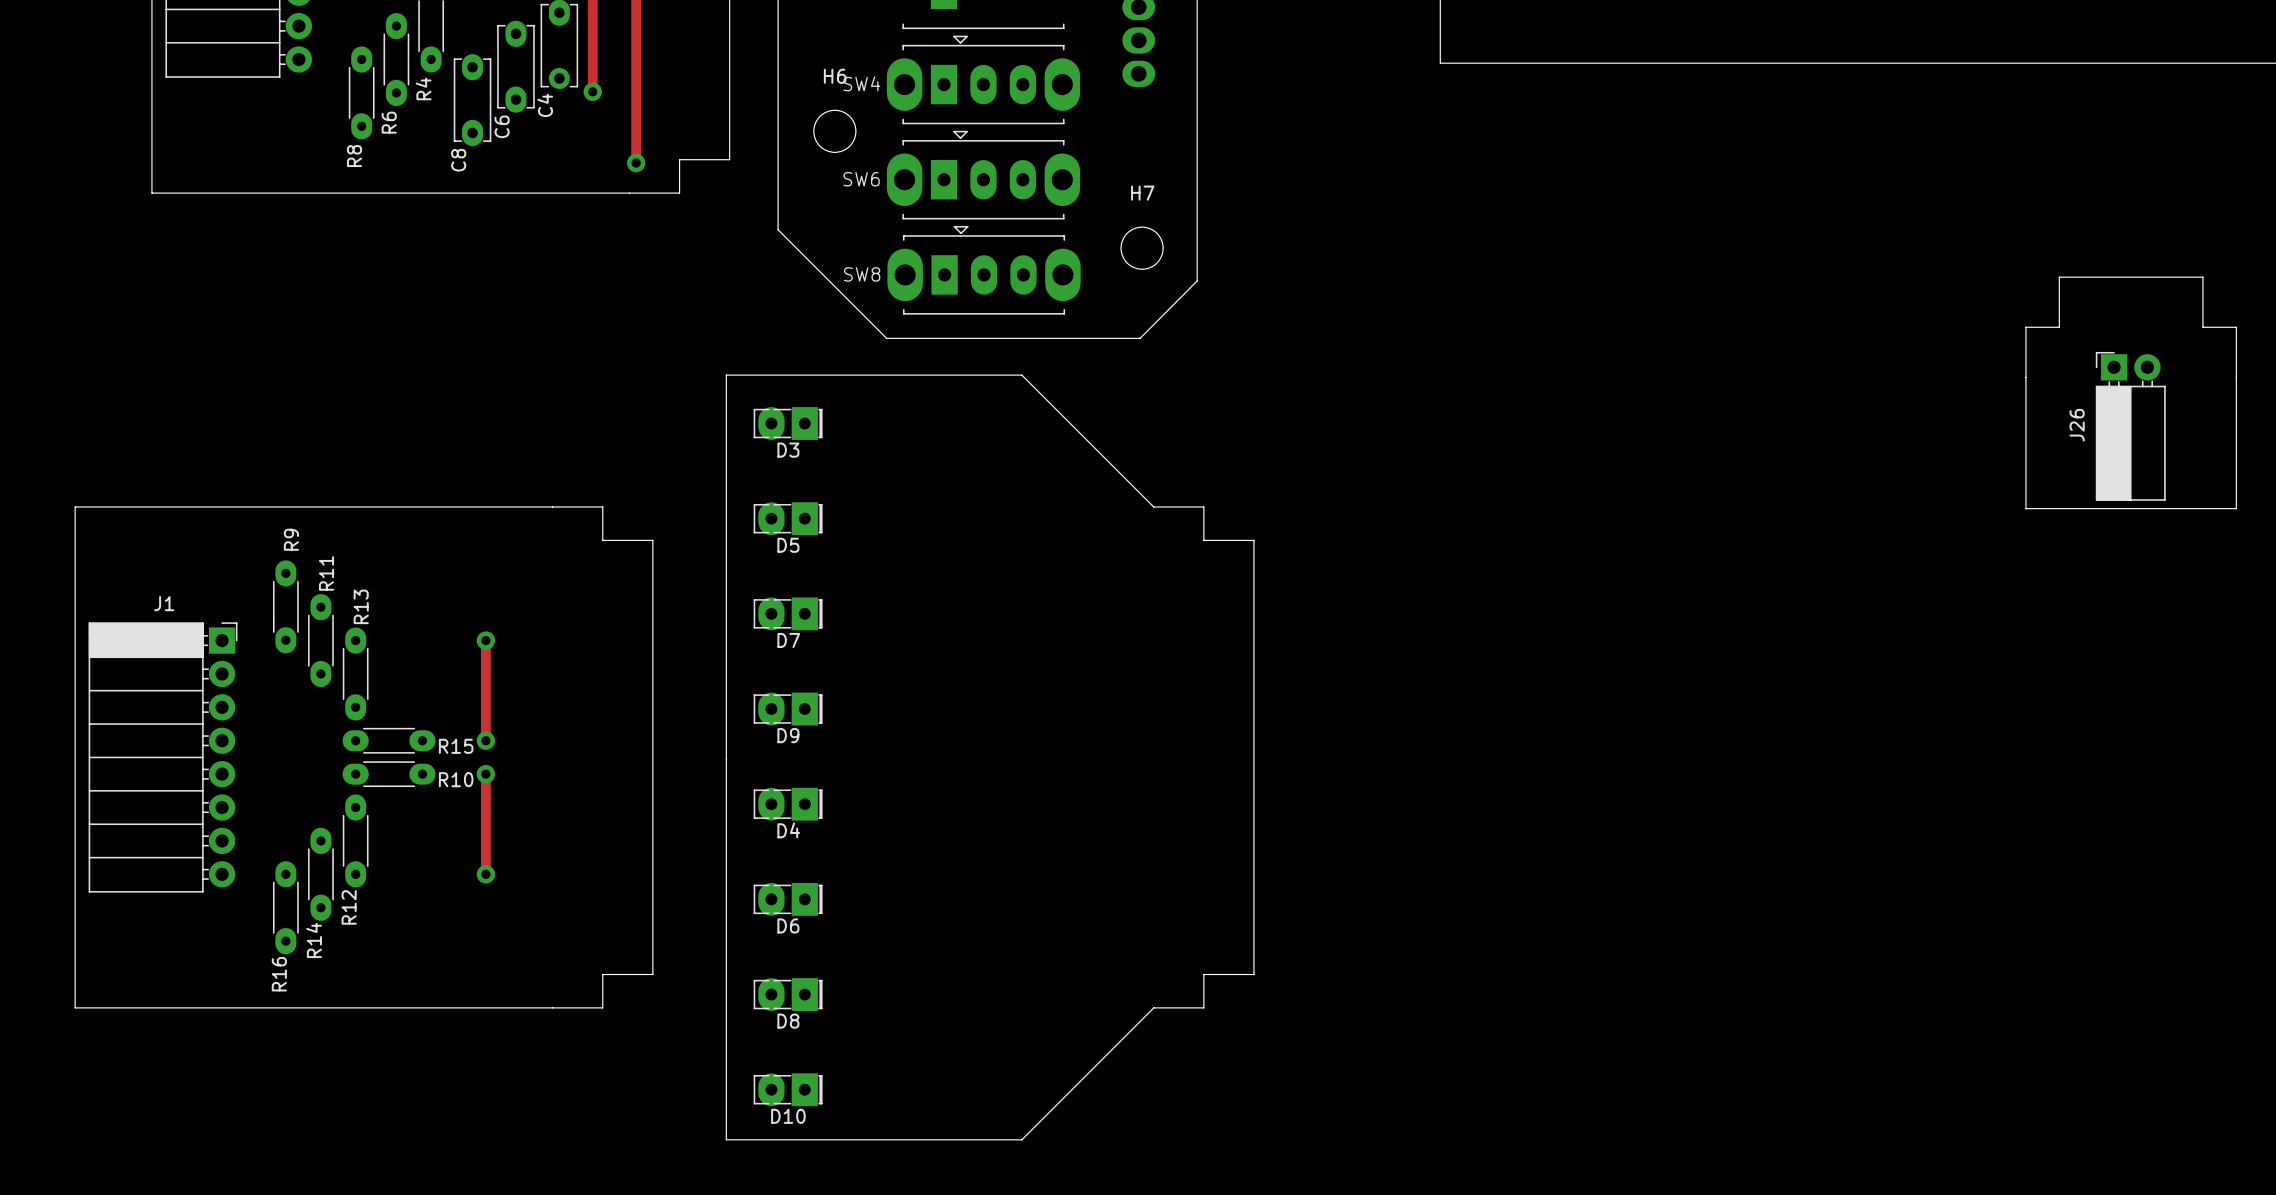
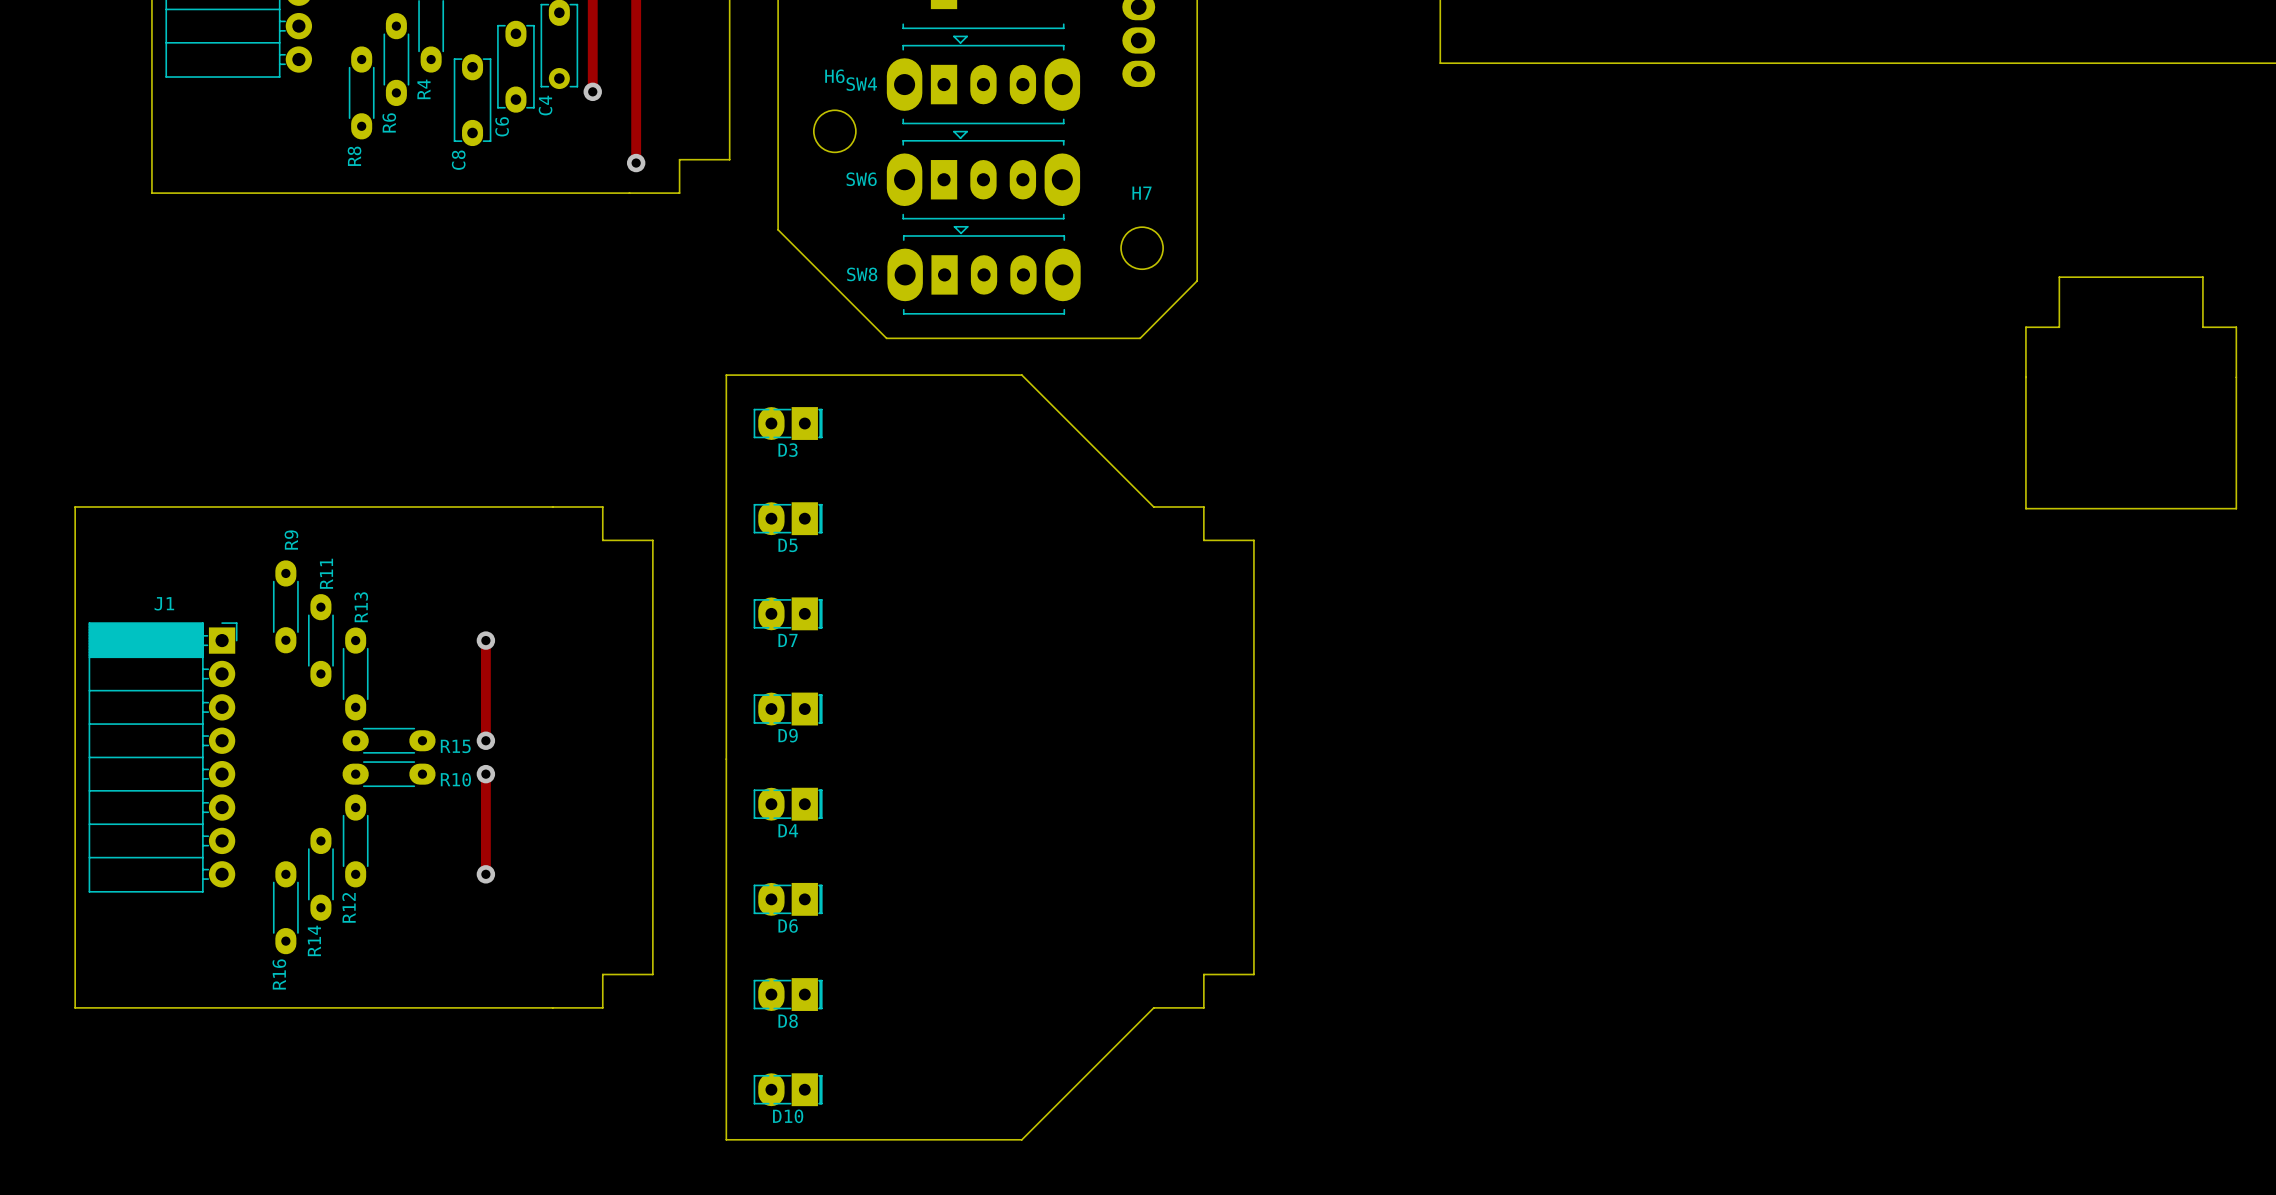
J26: (2130, 426) -> none

